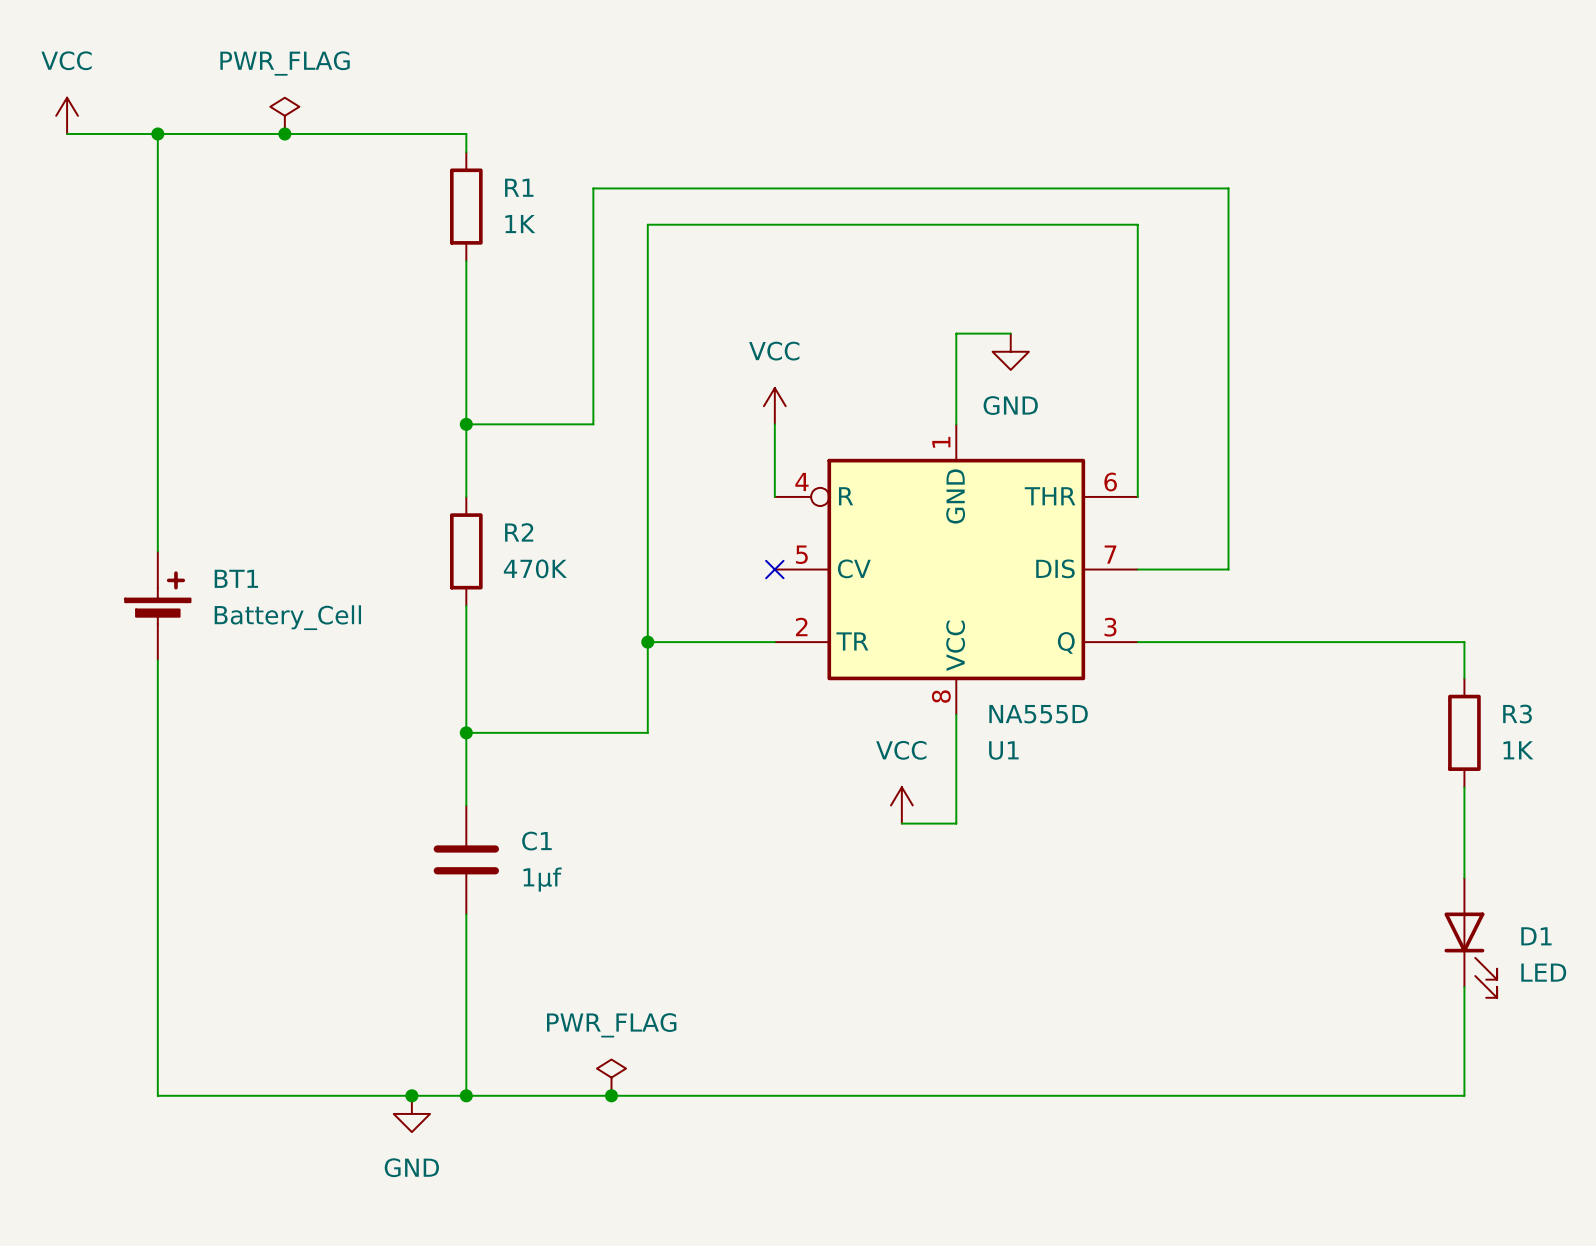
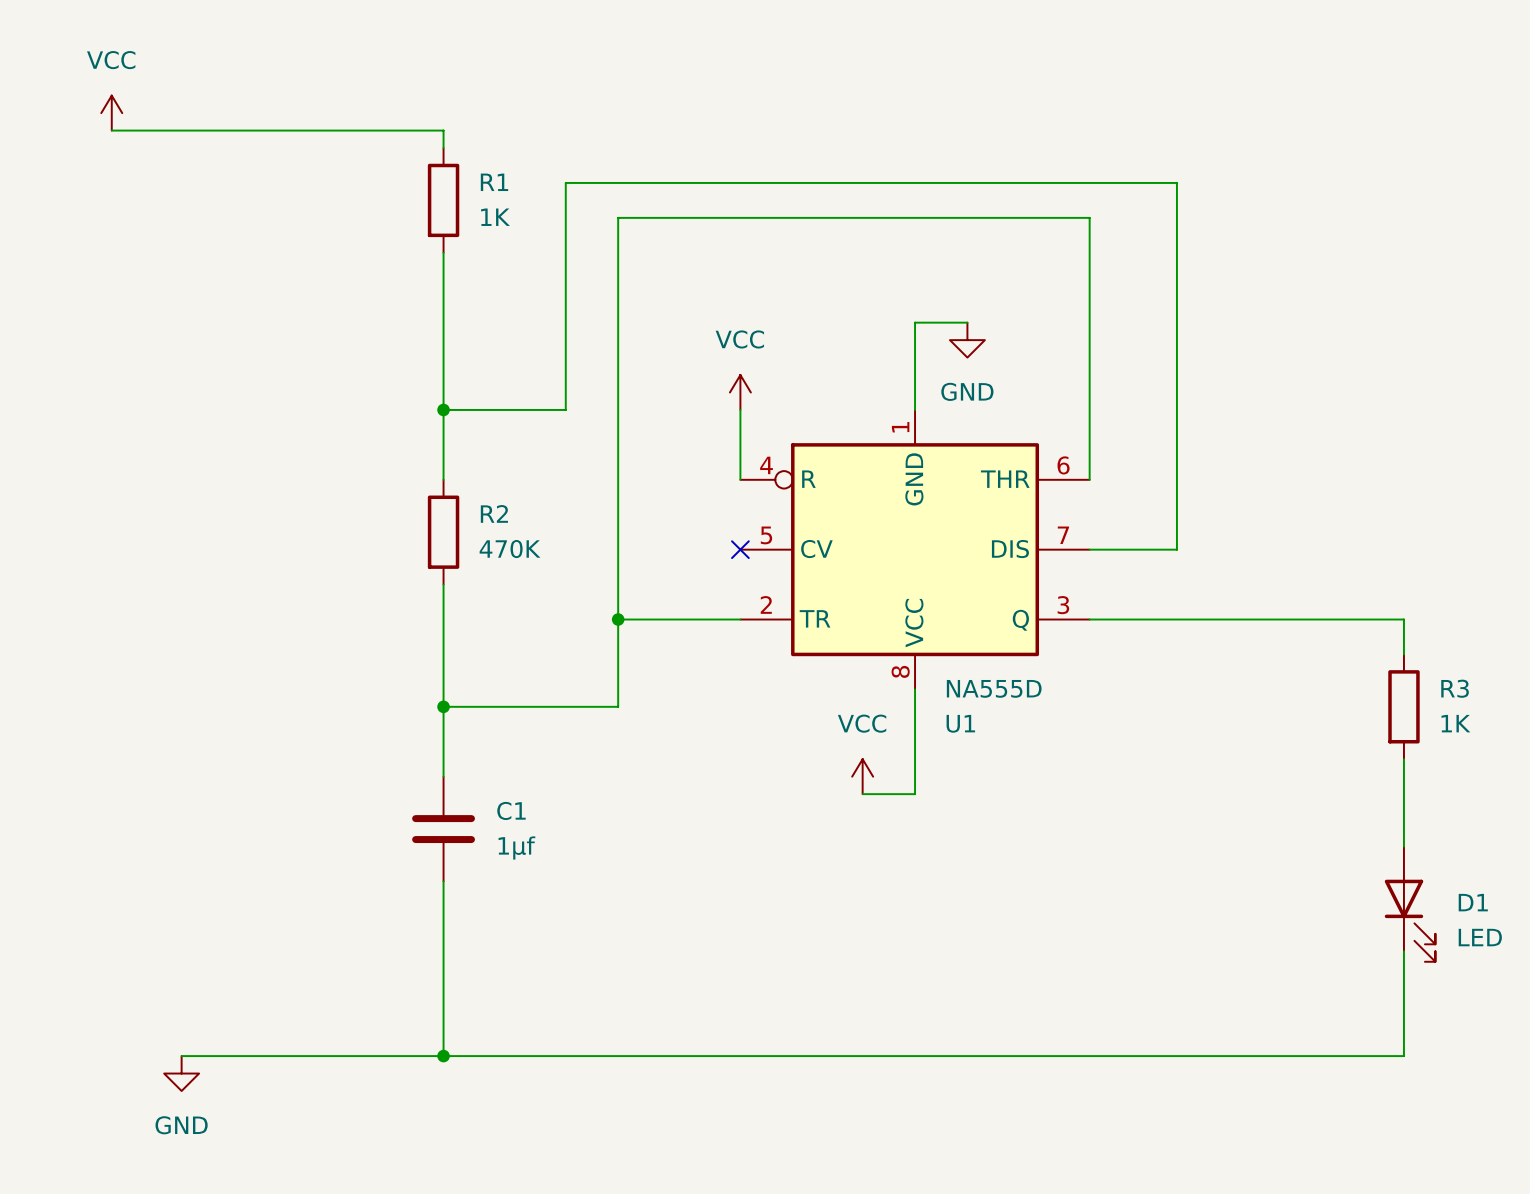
power symbol position: VCC (67, 115) -> VCC (111, 113)
power symbol: PWR_FLAG (284, 115) -> none
wire: (67, 133) (121, 133) -> none
wire: (157, 133) (157, 551) -> none
junction: (157, 133) -> none
junction: (284, 133) -> none
BT1: Battery_Cell (157, 605) -> none
wire: (157, 660) (157, 1095) (194, 1095) -> none
power symbol: PWR_FLAG (611, 1077) -> none
junction: (411, 1095) -> none
junction: (611, 1095) -> none
power symbol position: GND (411, 1113) -> GND (181, 1073)

